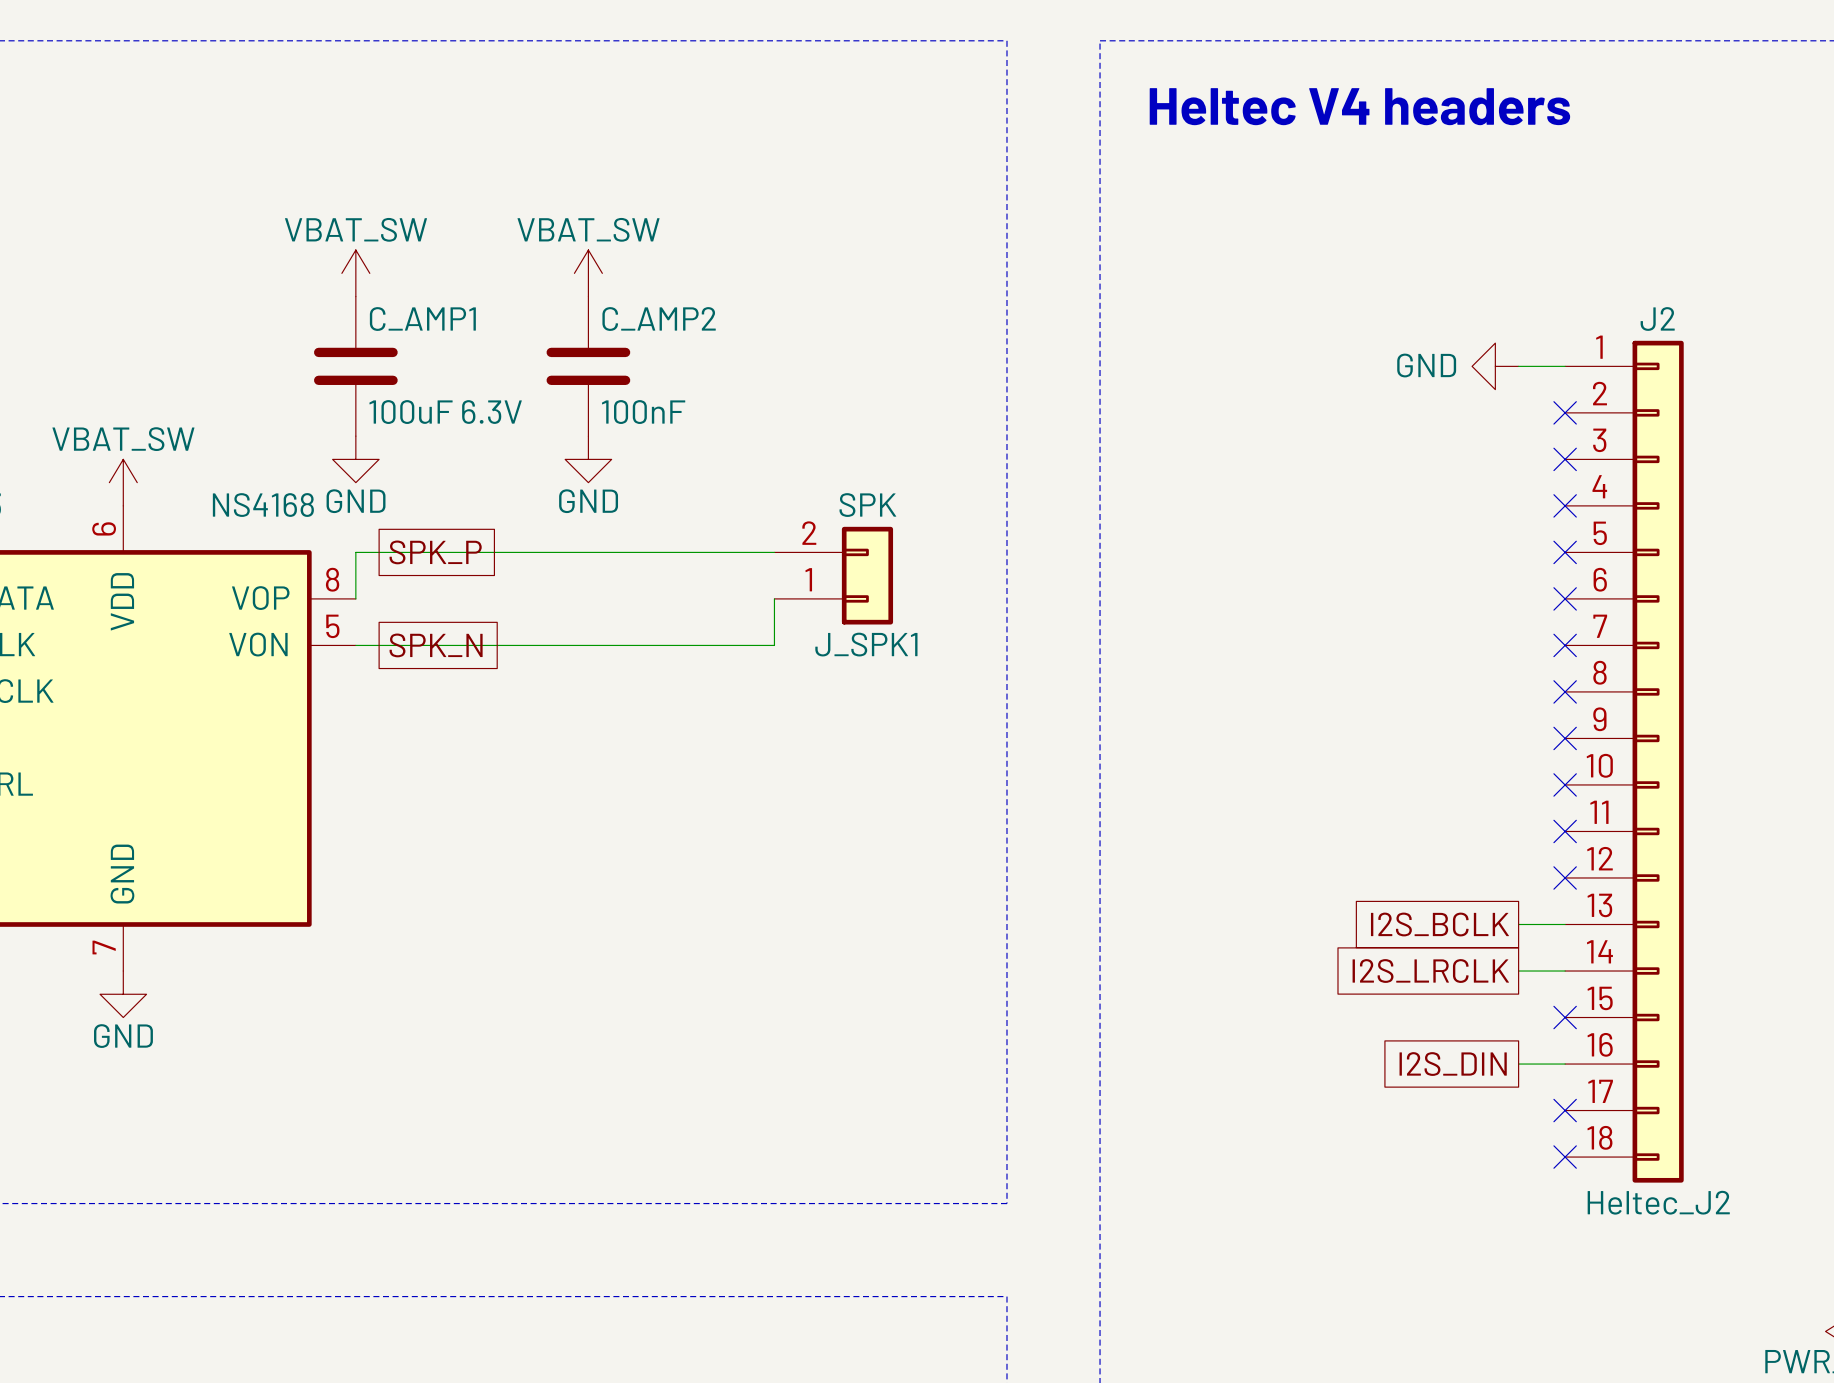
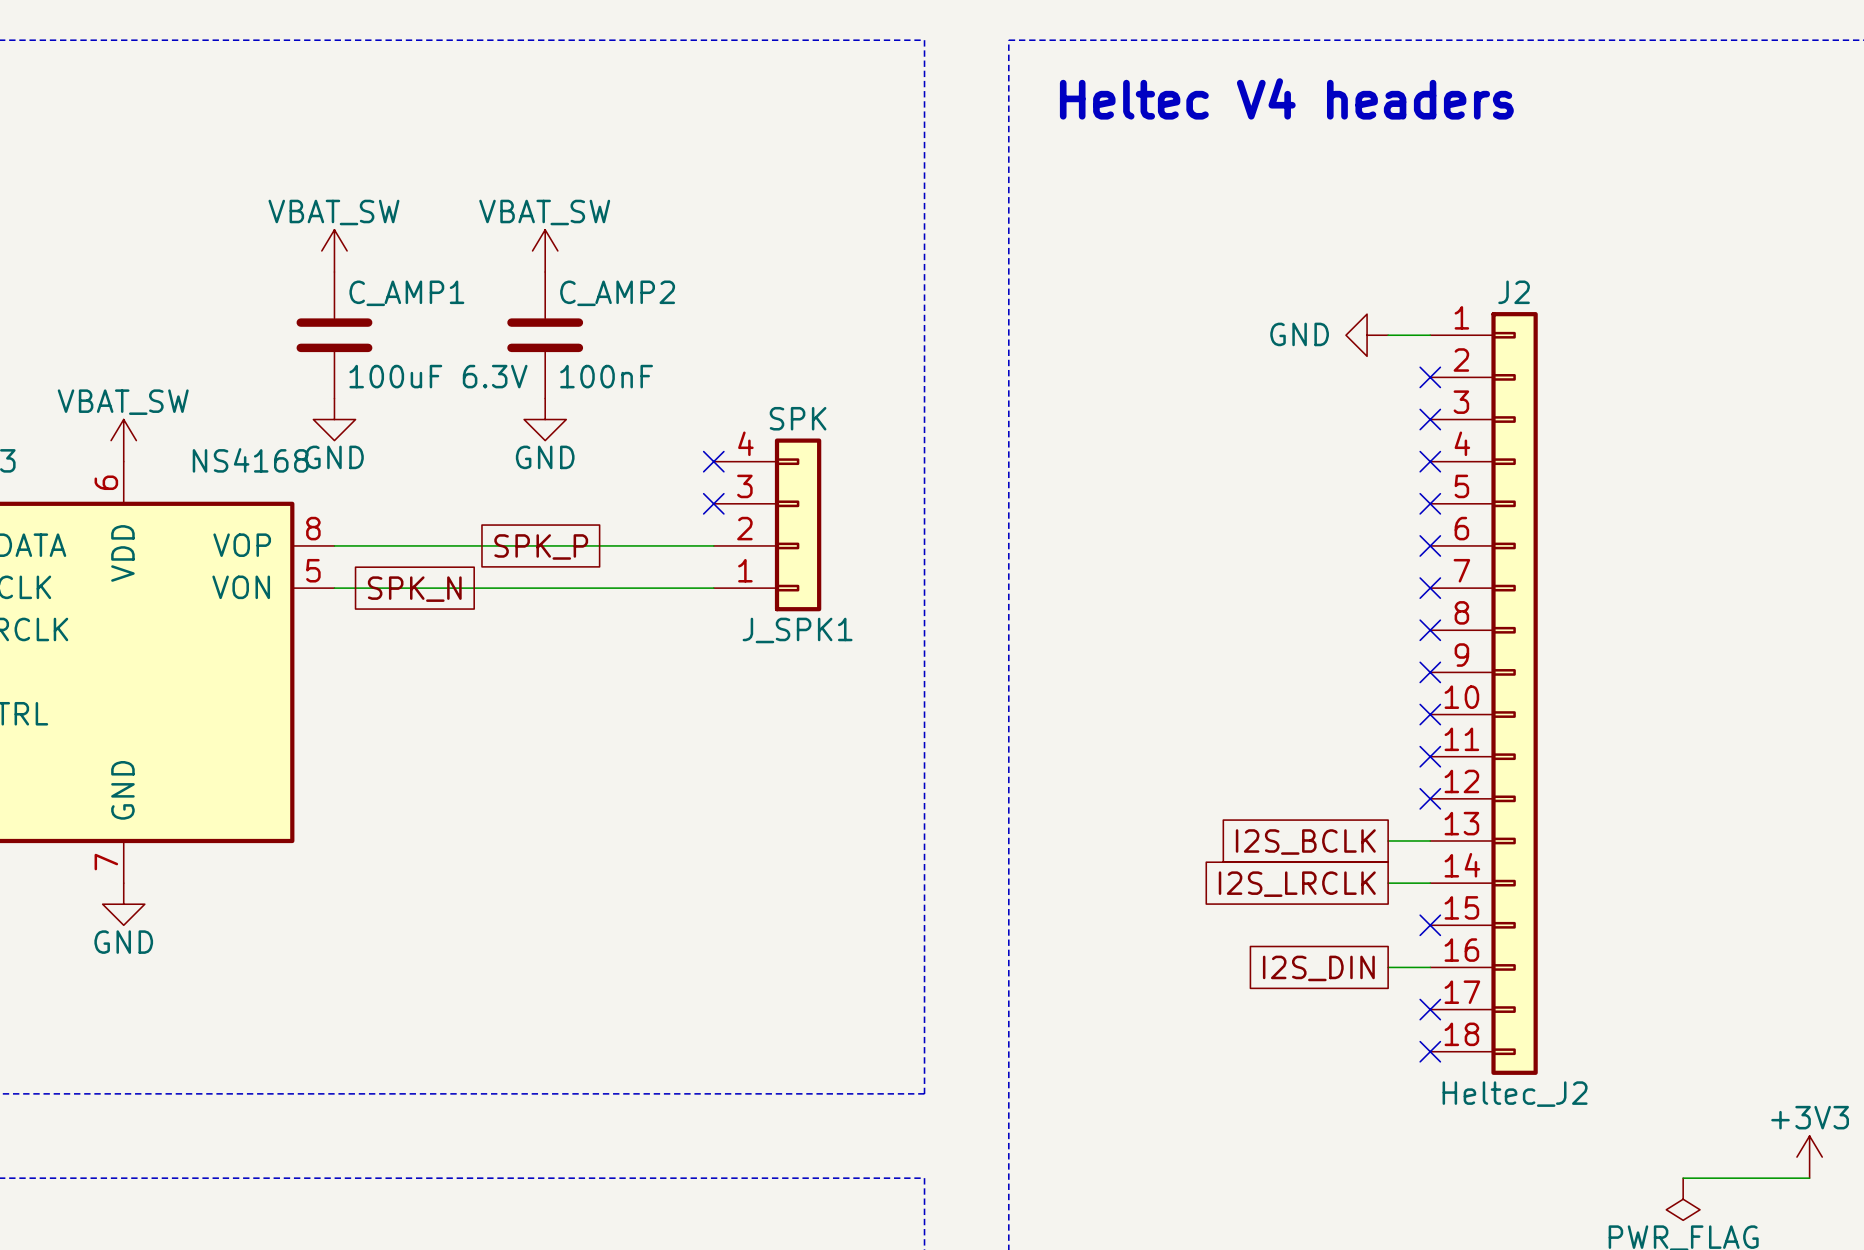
no-connect mark: none -> (713, 461)
J_SPK1 value position: SPK (867, 505) -> SPK (798, 418)
J_SPK1 symbol: [774, 526, 894, 625] -> [713, 438, 822, 612]
global label position: SPK_P (435, 552) -> SPK_P (541, 546)
wire: (774, 552) (355, 552) (355, 598) -> (713, 545) (334, 545)
no-connect mark: none -> (713, 503)
wire: (774, 598) (774, 645) -> none
J_SPK1 name position: J_SPK1 (866, 644) -> J_SPK1 (797, 630)

